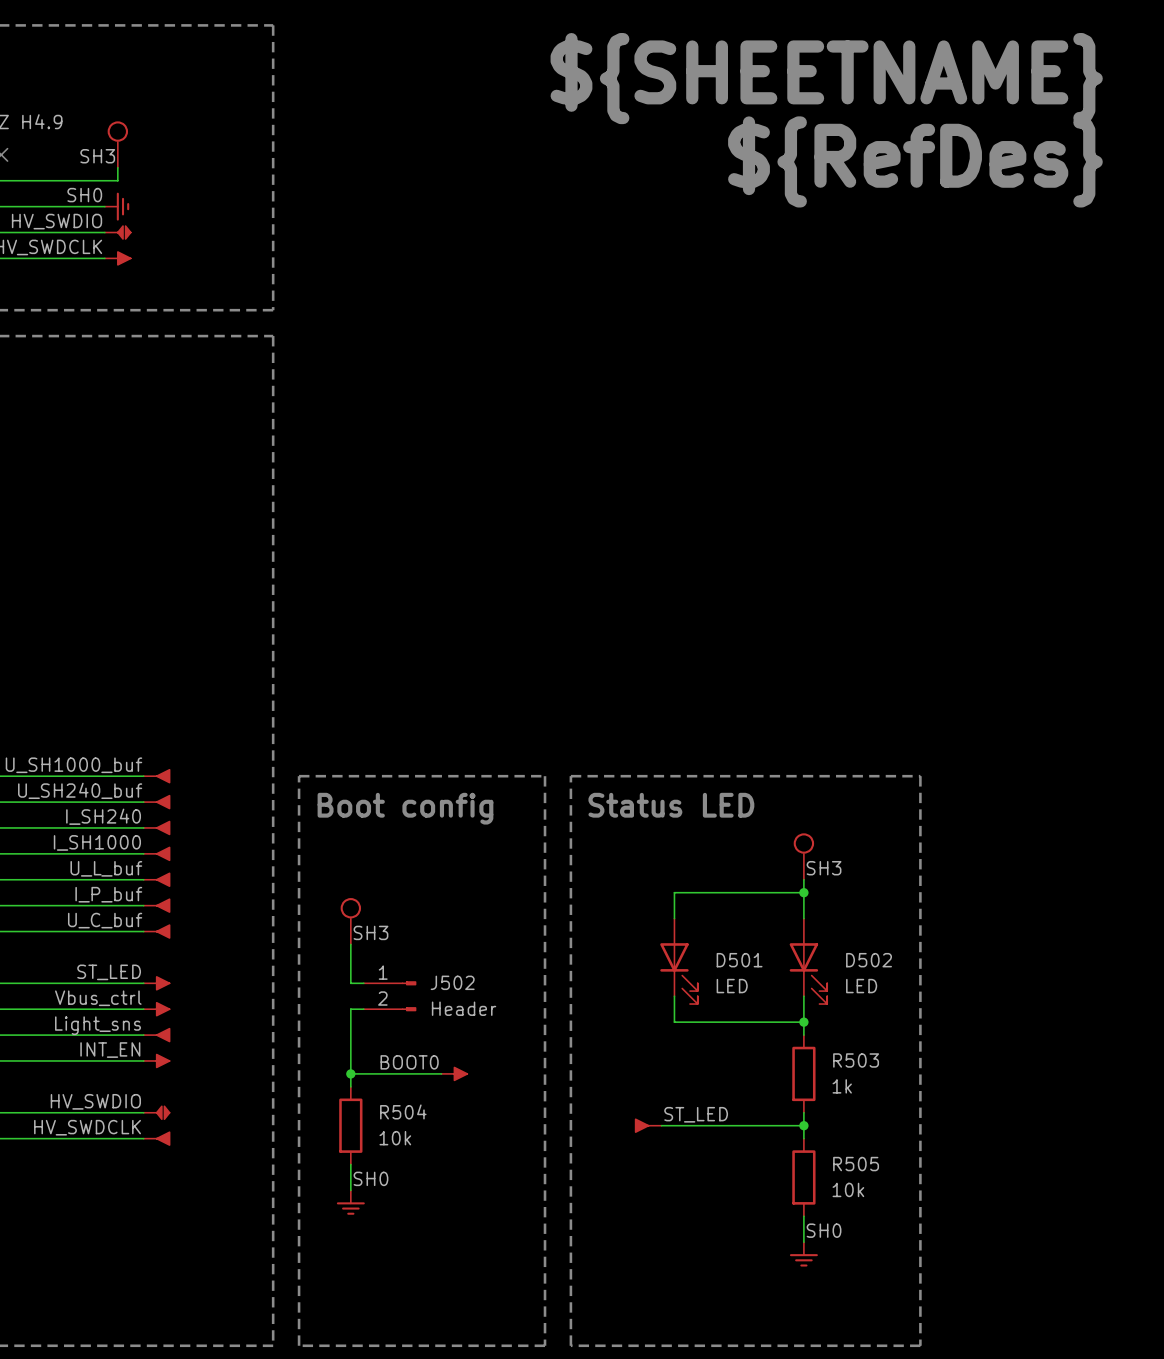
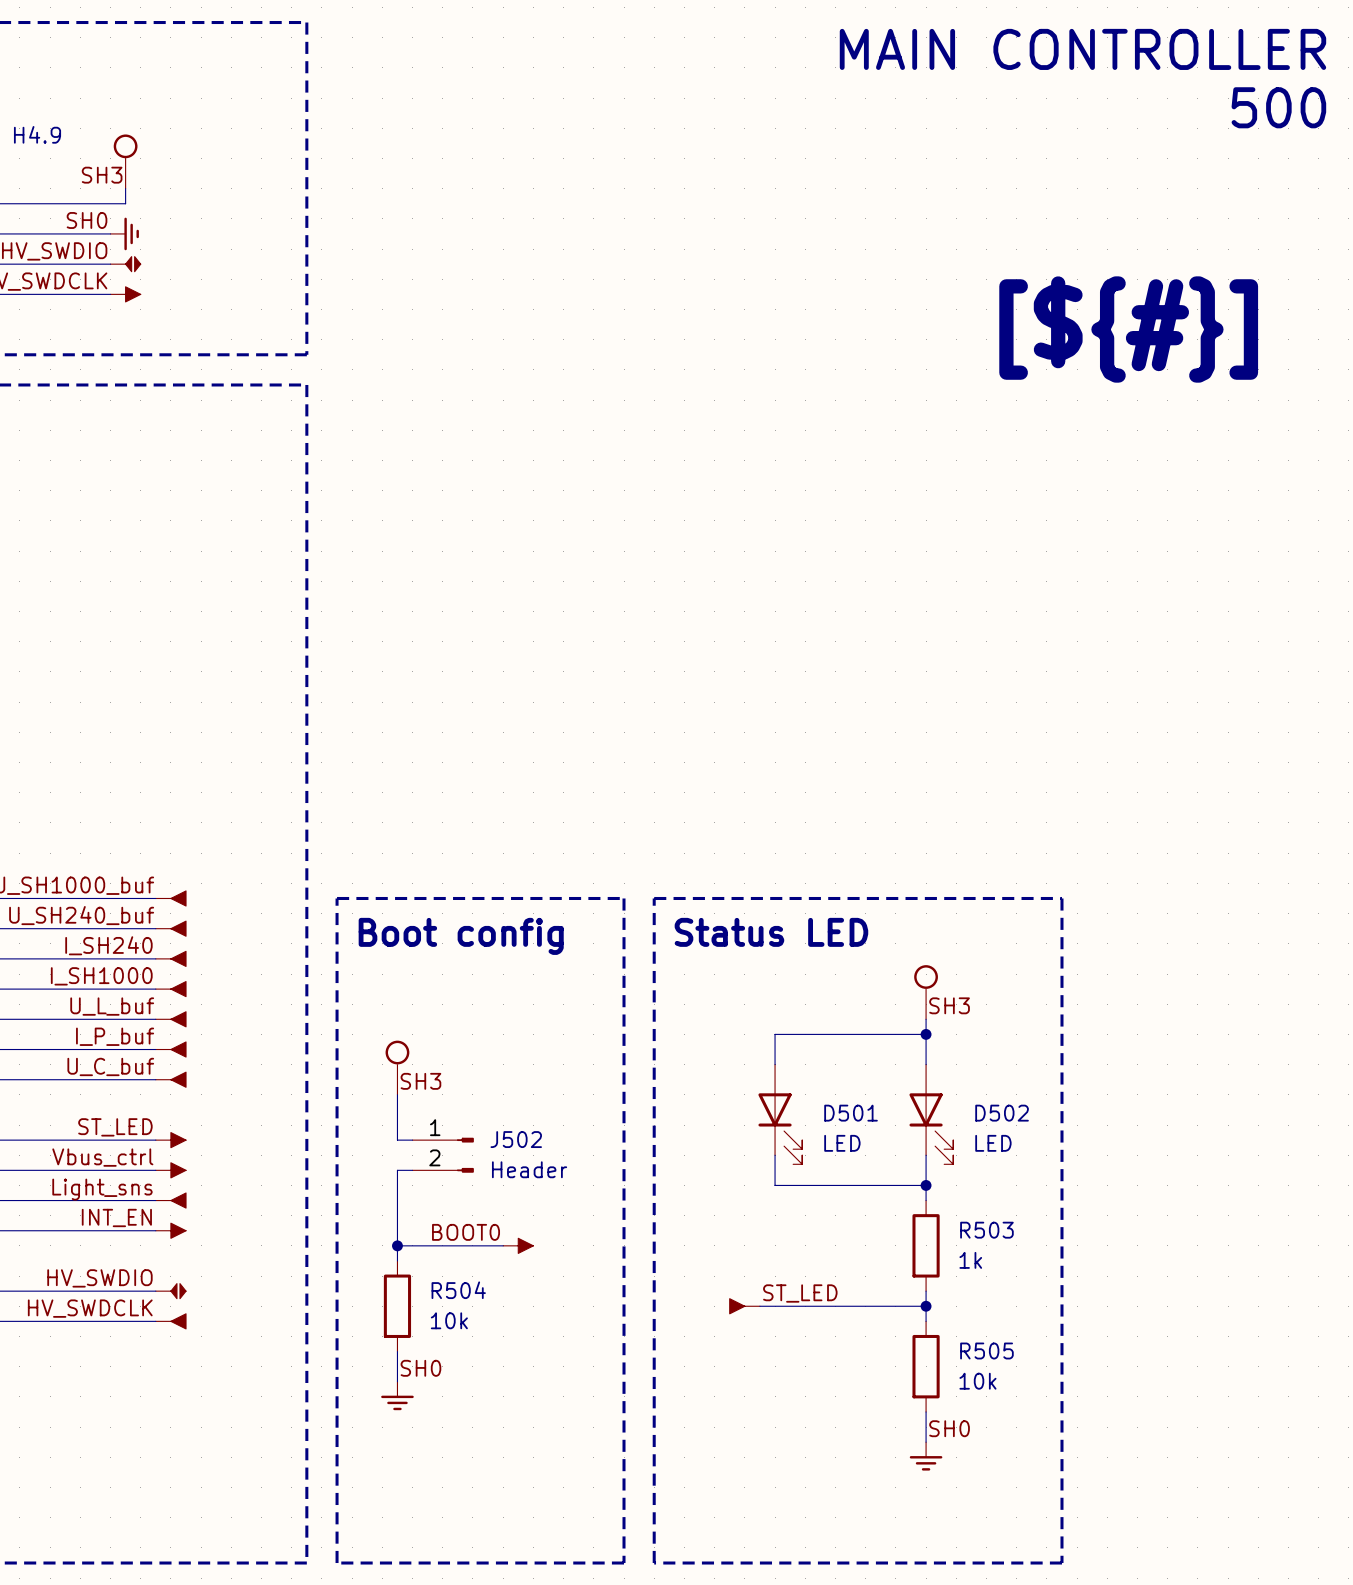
text: none -> MAIN CONTROLLER (1082, 49)
text: ${SHEETNAME} (826, 78) -> none
text: none -> 500 (1278, 107)
text: ${RefDes} (915, 161) -> none
text: none -> [${#}] (1128, 329)

